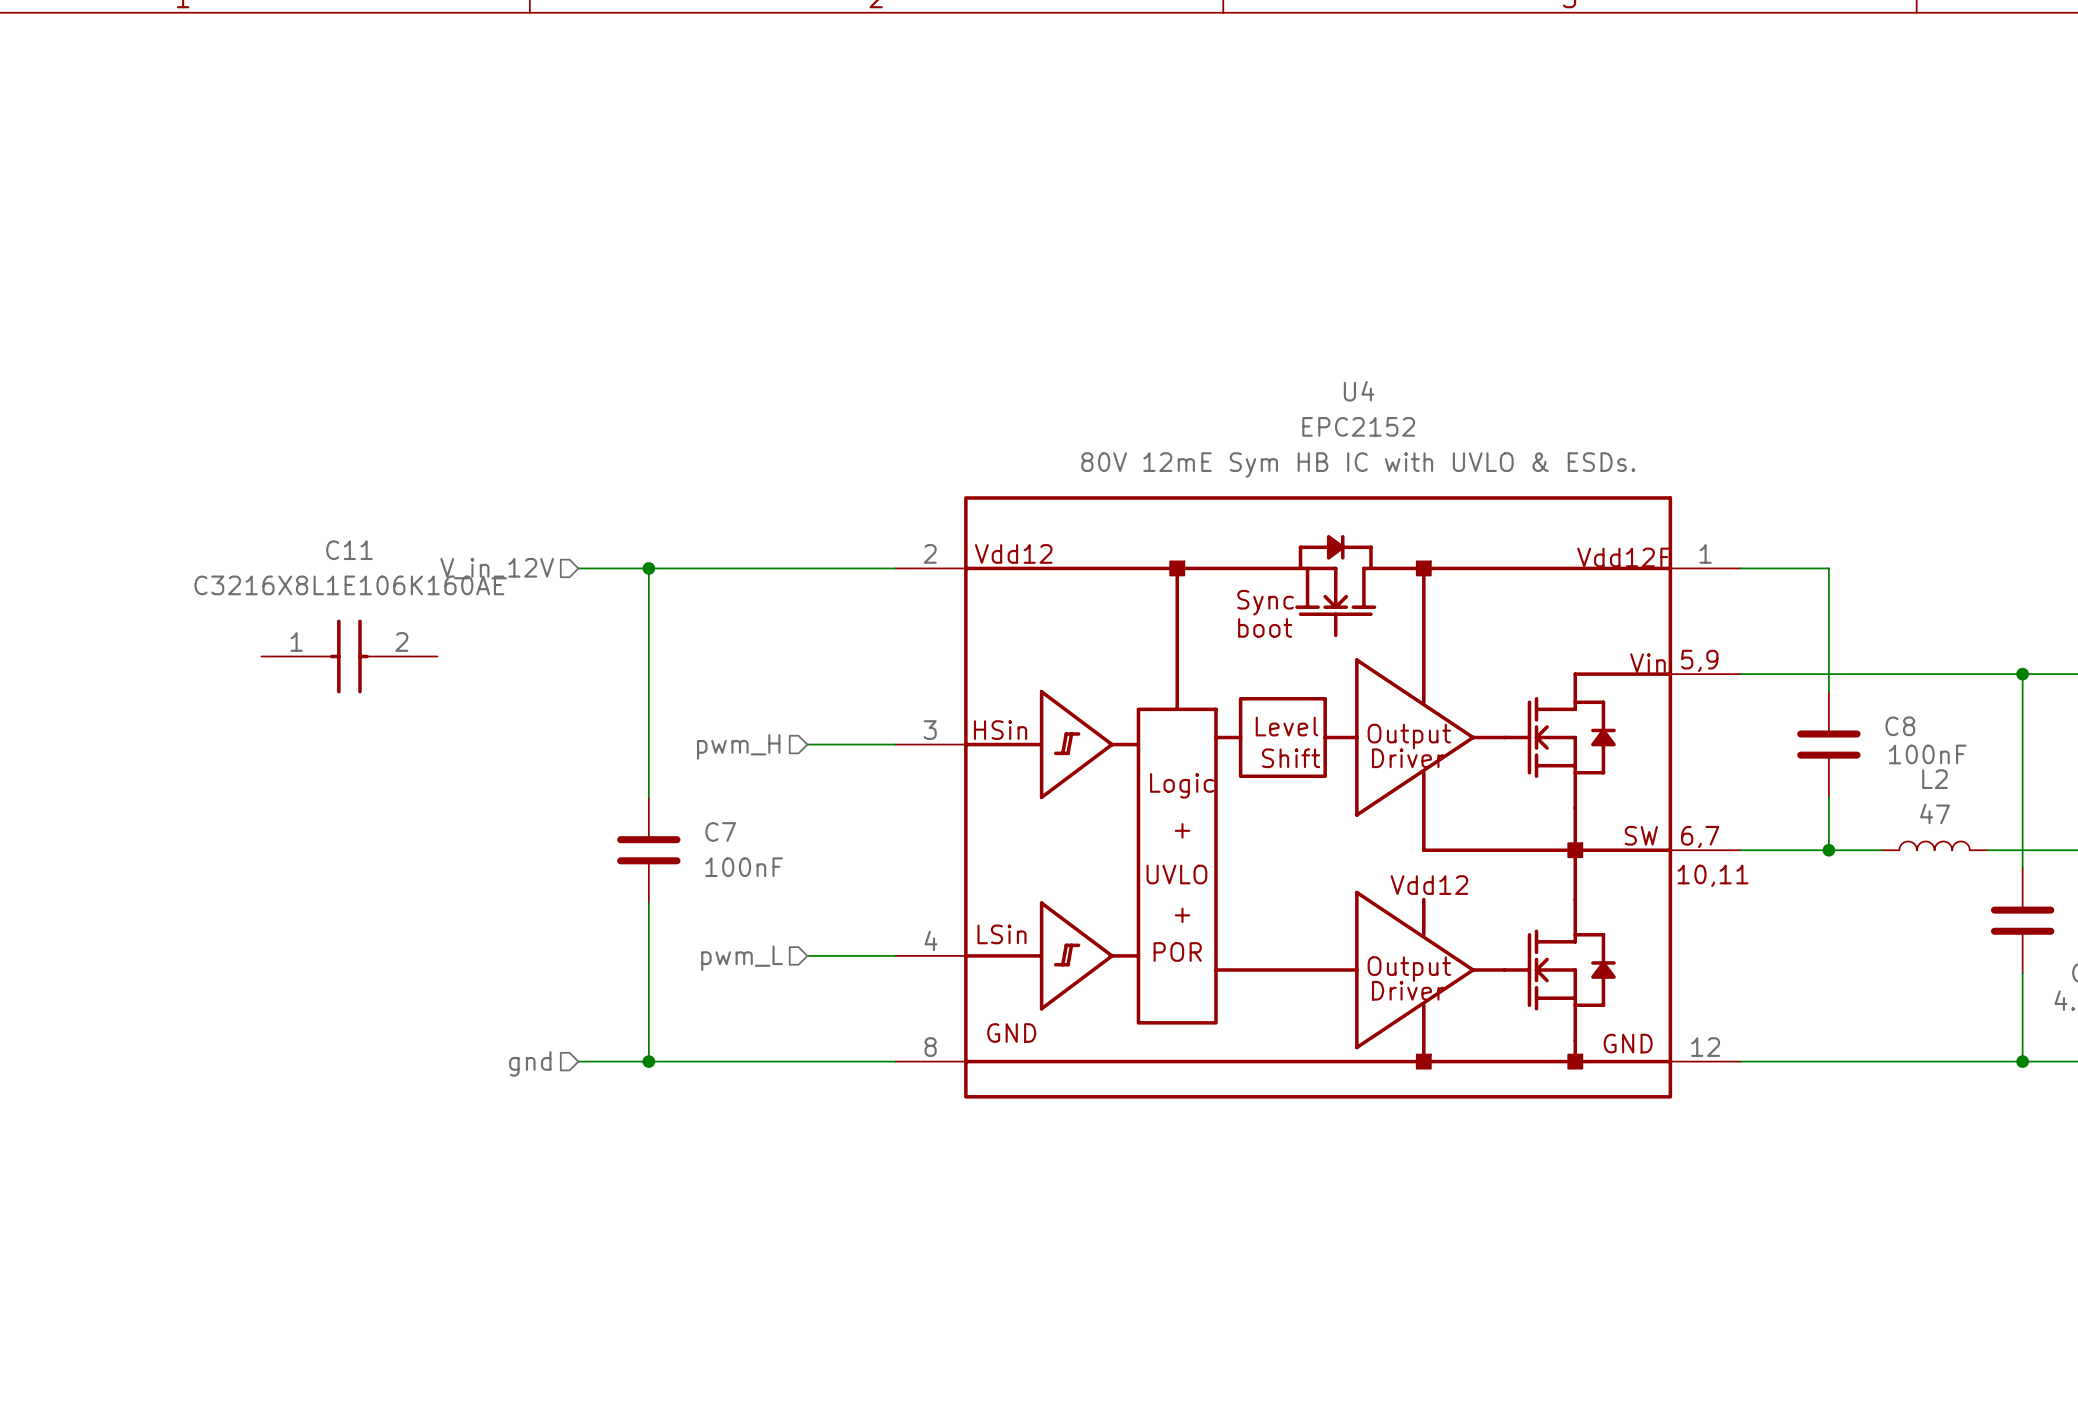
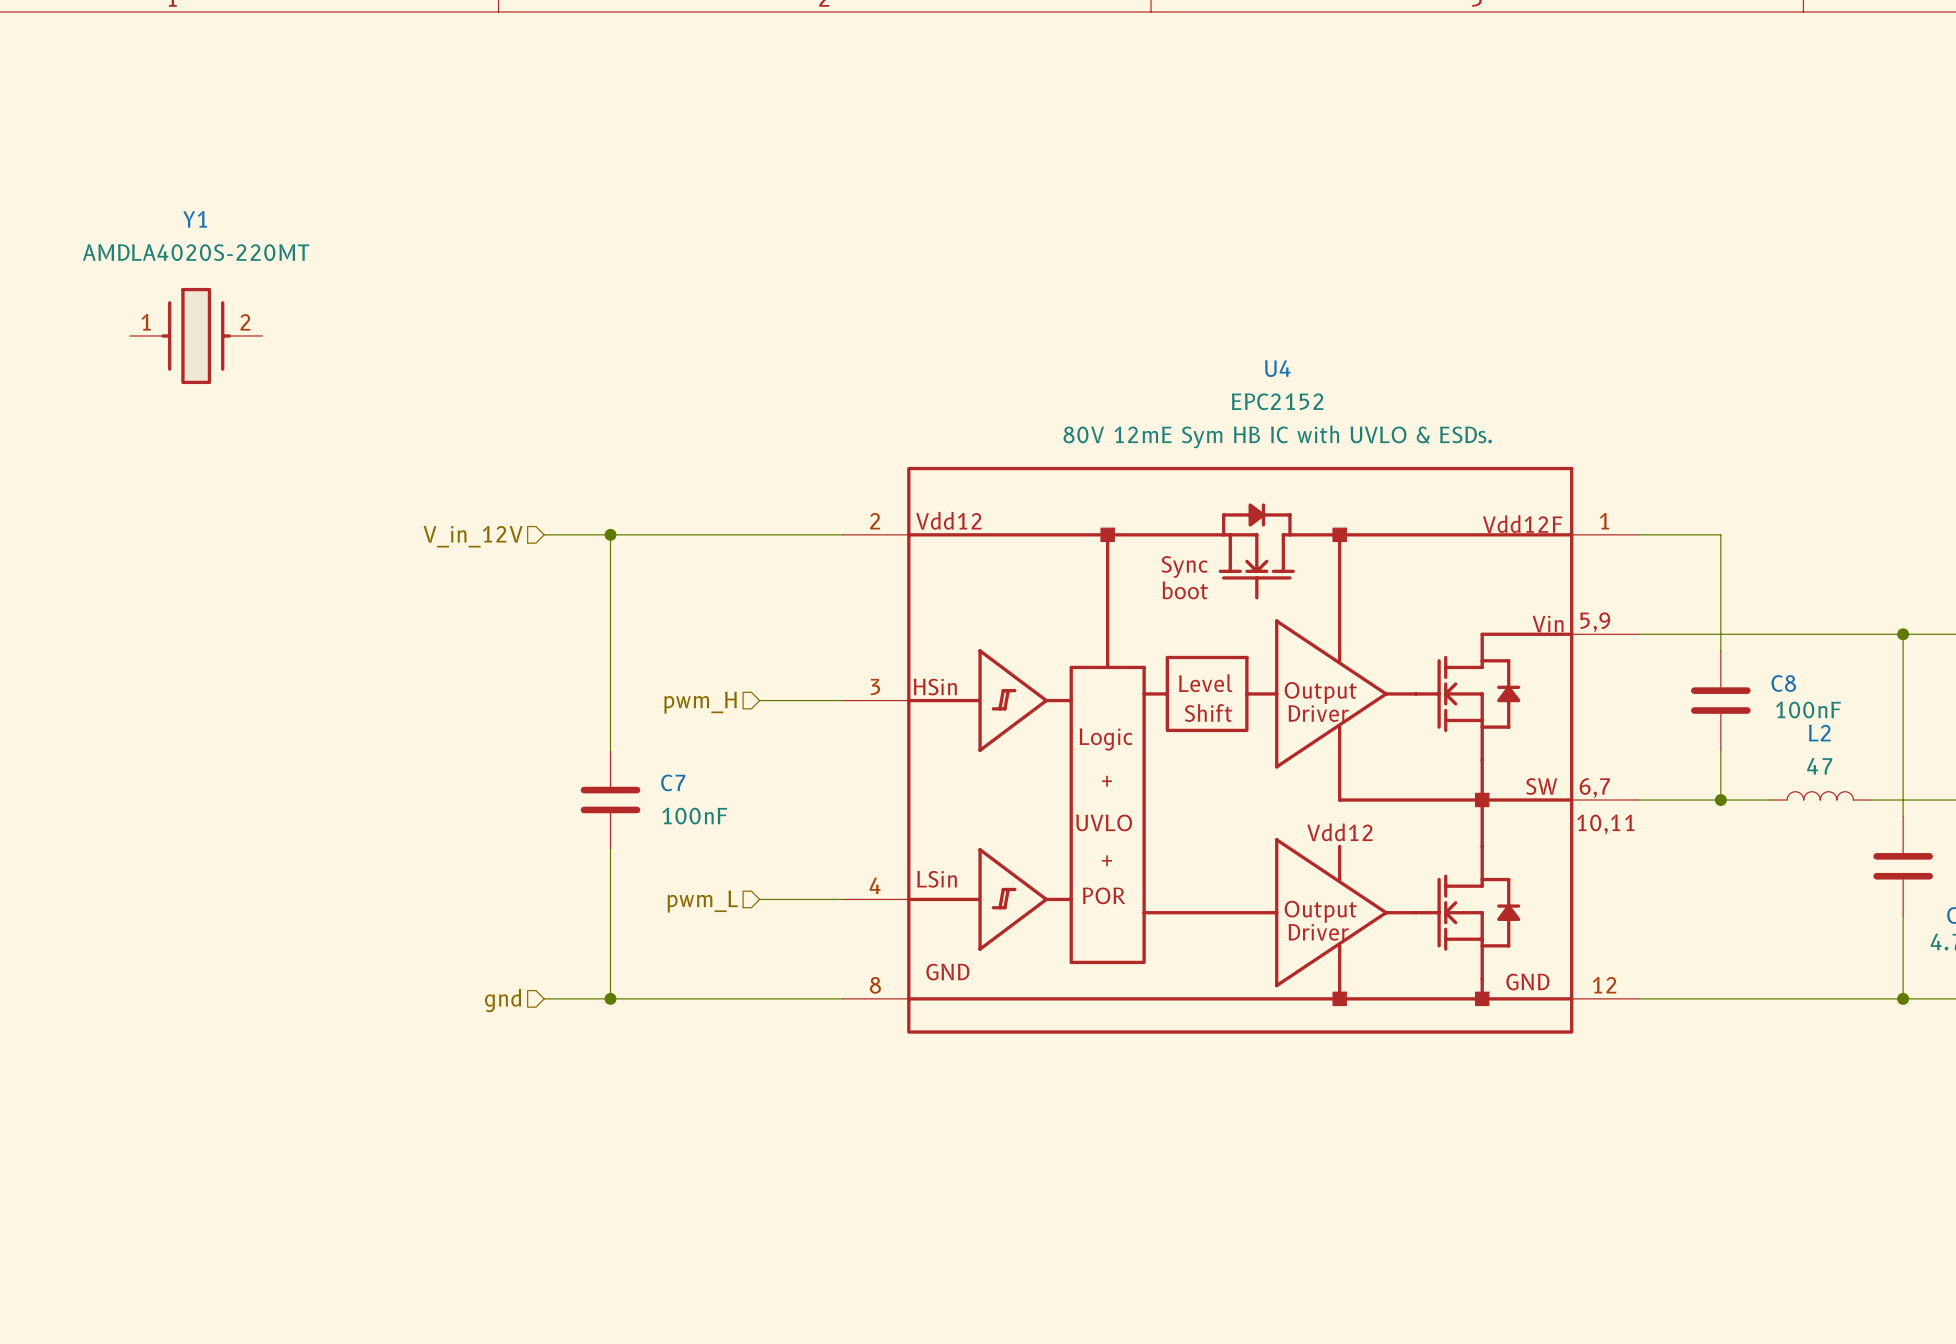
Y1: none -> AMDLA4020S-220MT (196, 335)
C11: C3216X8L1E106K160AE (349, 656) -> none

